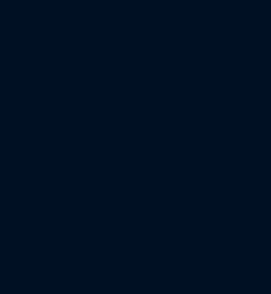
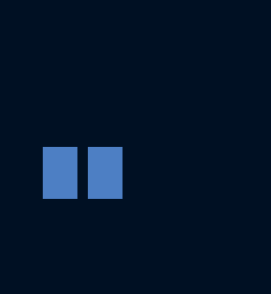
part: none -> (82, 172)

